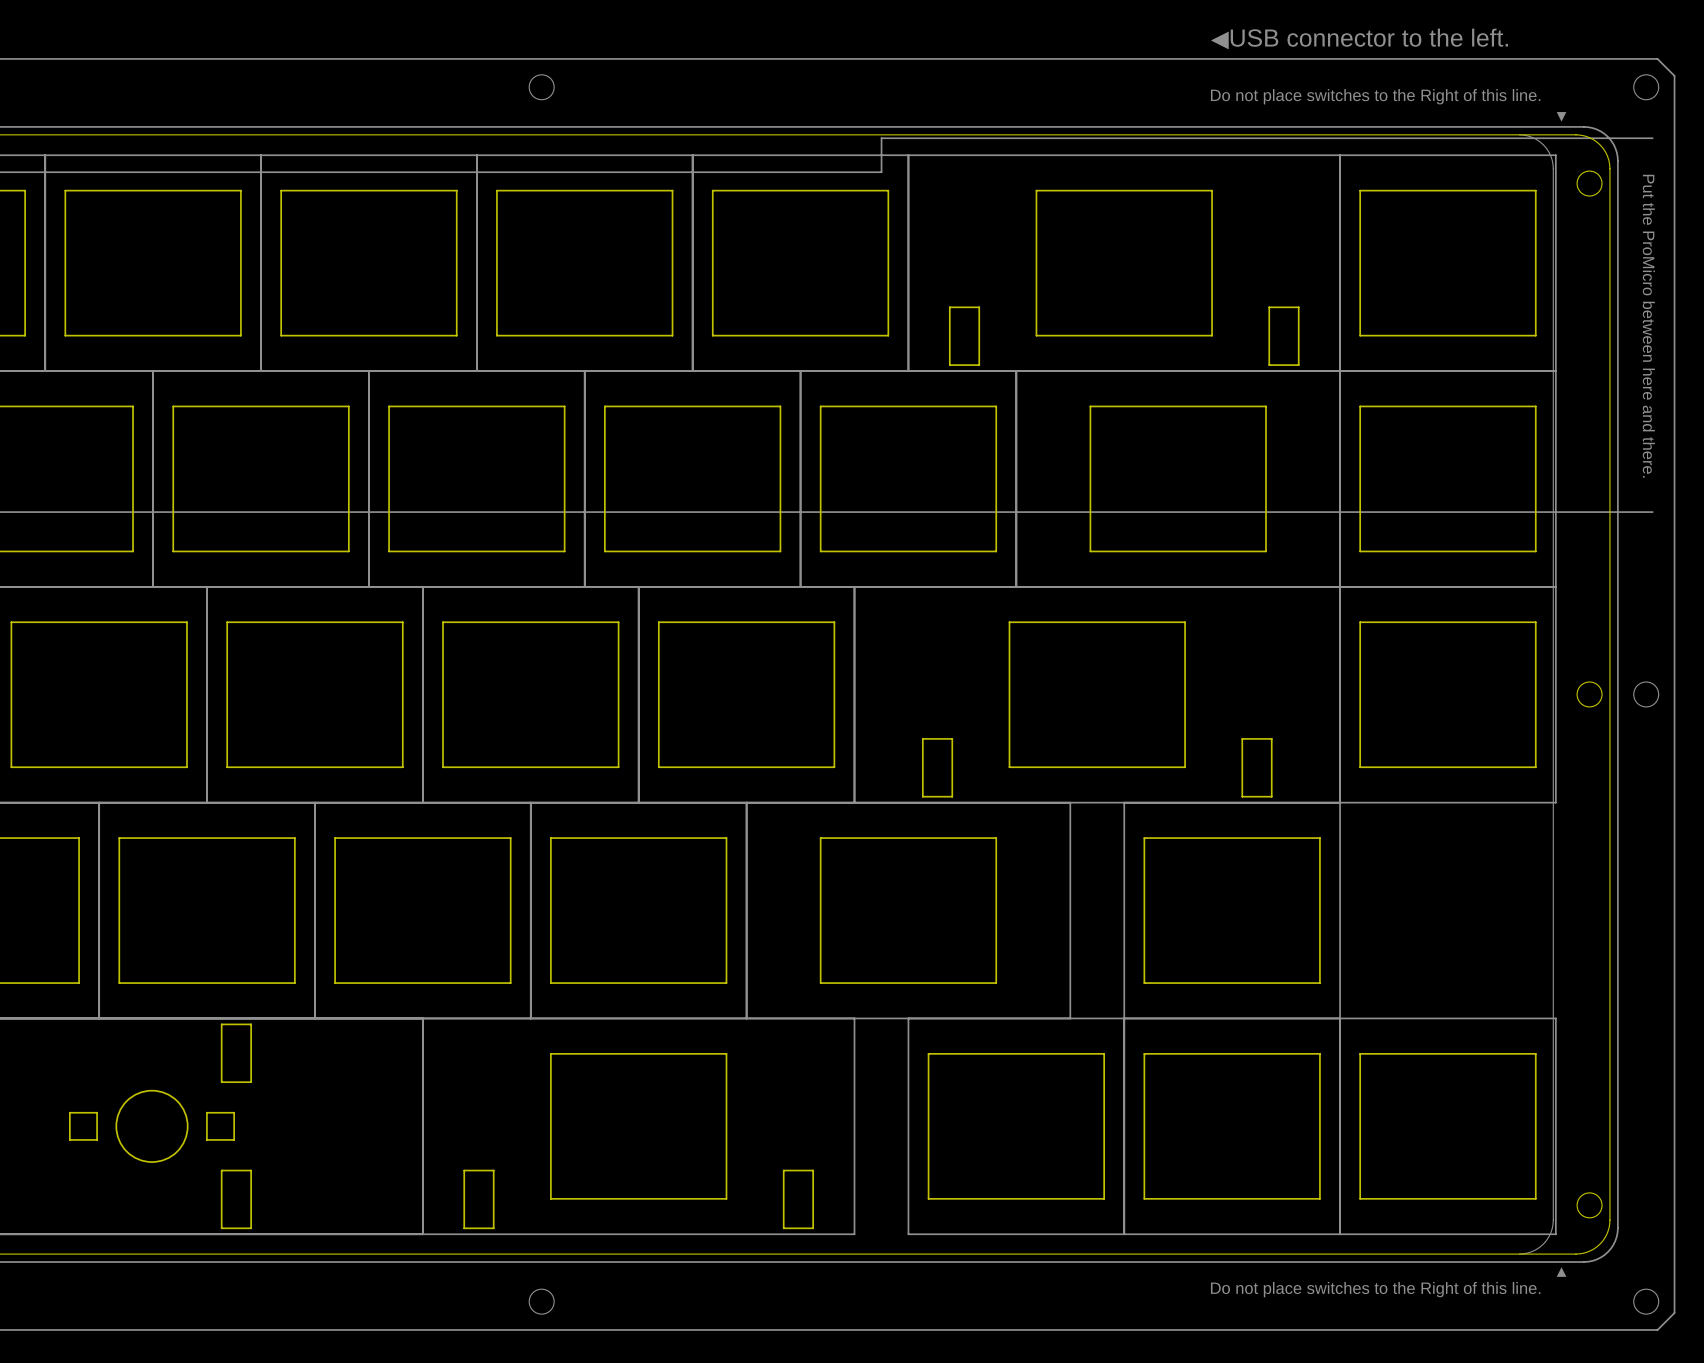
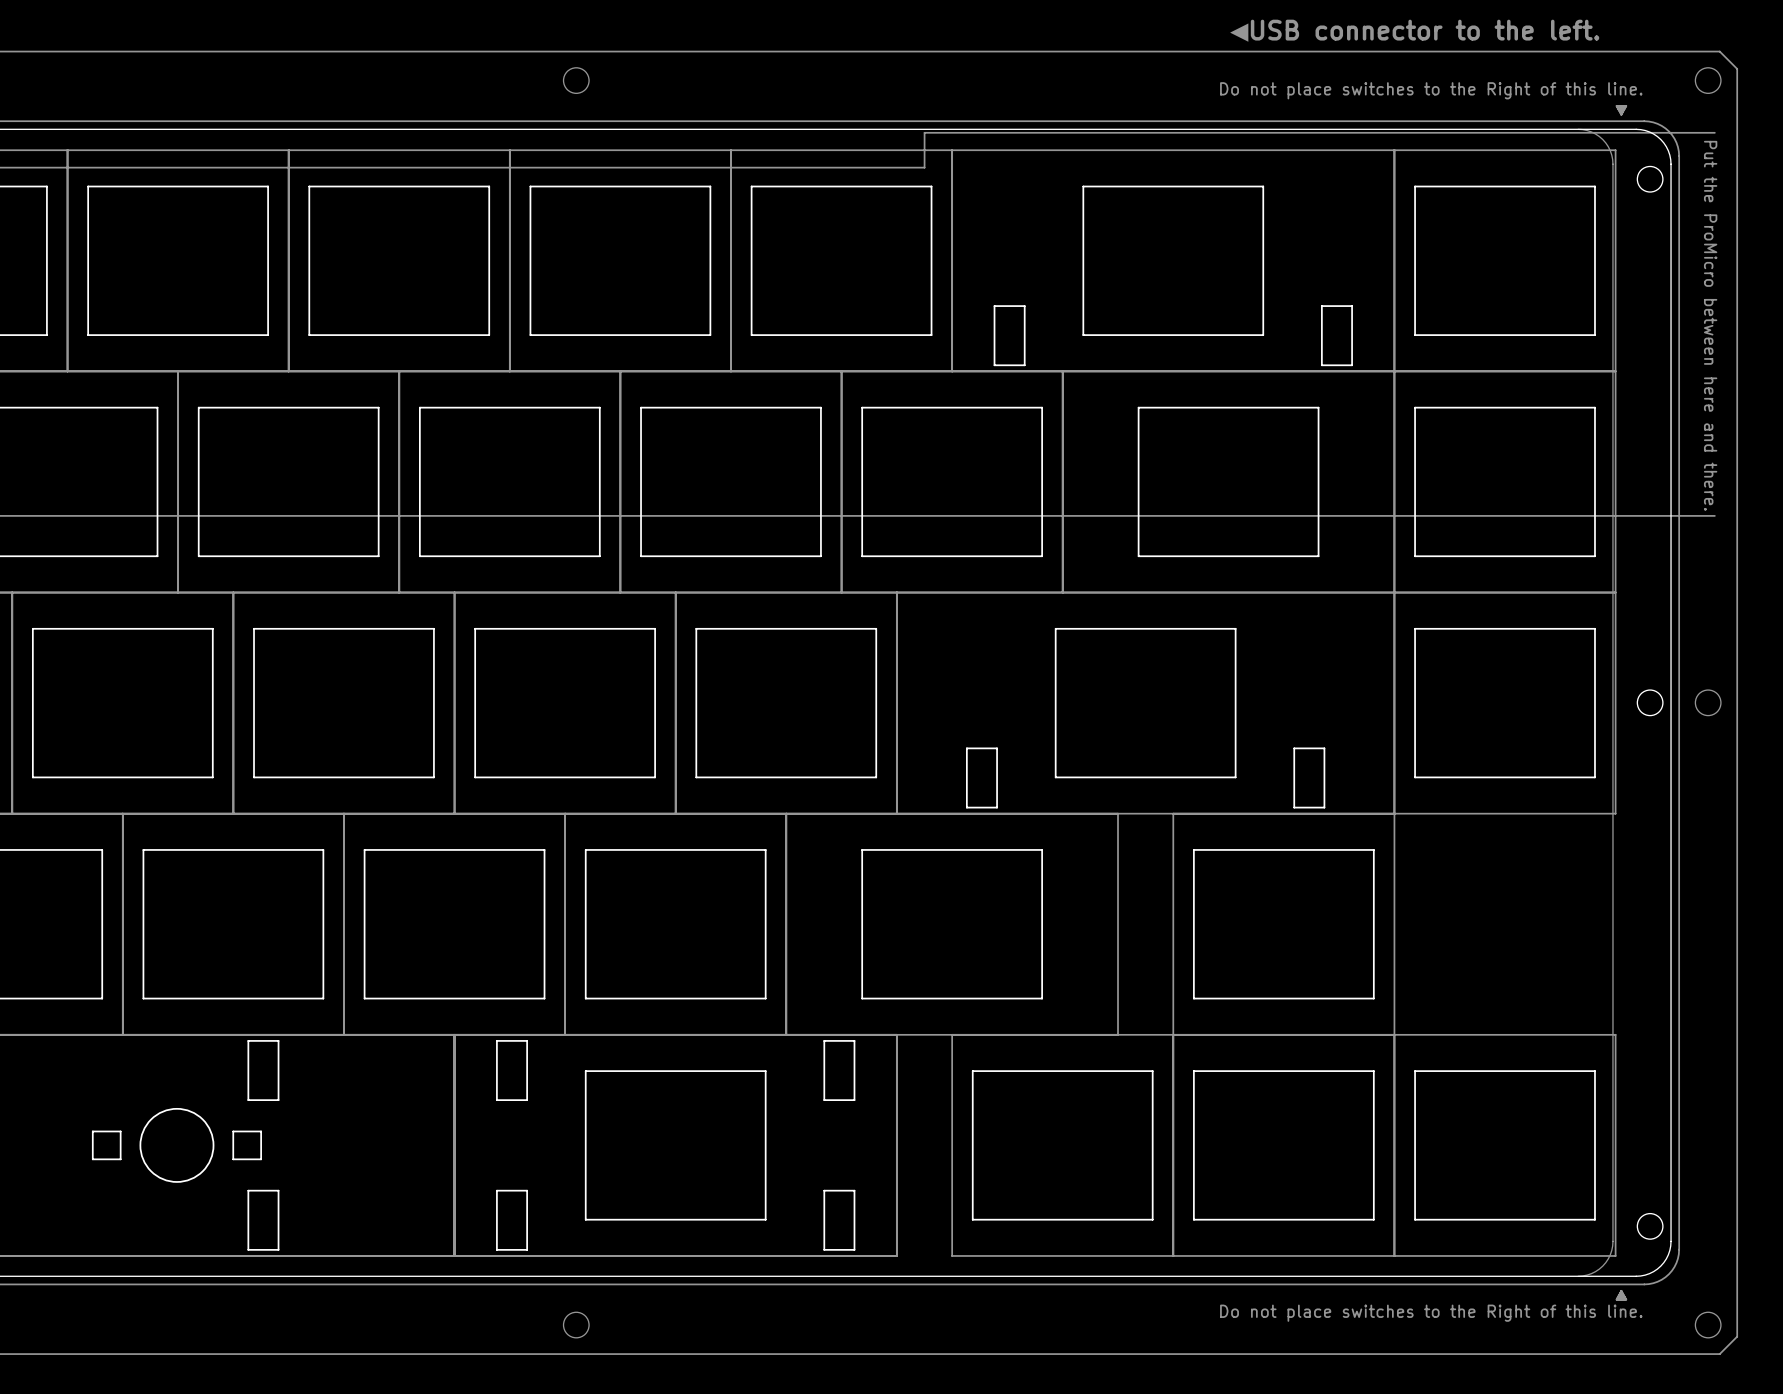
drawing: [422, 1017, 856, 1236] -> none
drawing: none -> [453, 1033, 898, 1257]

